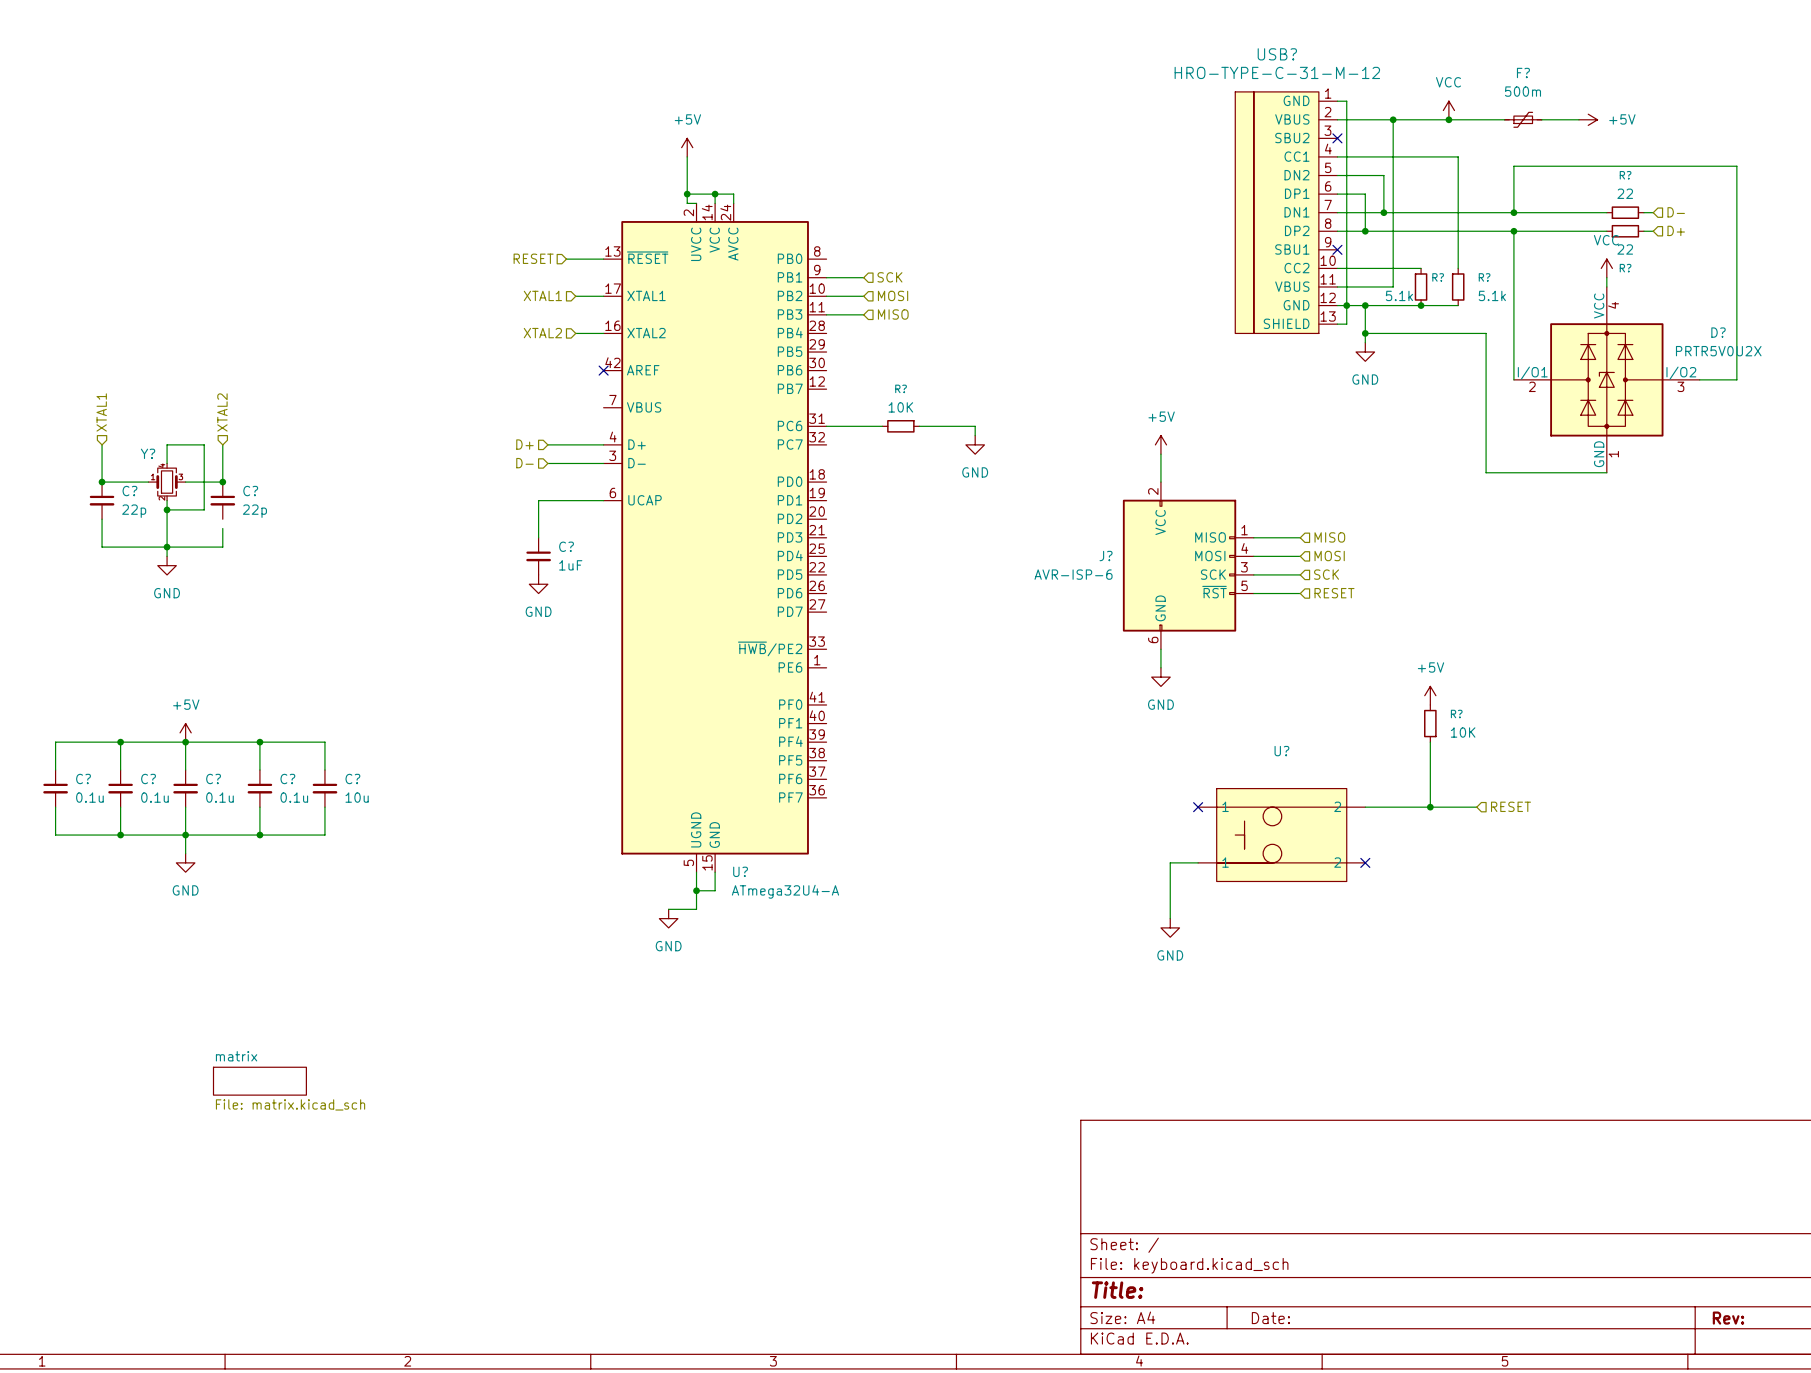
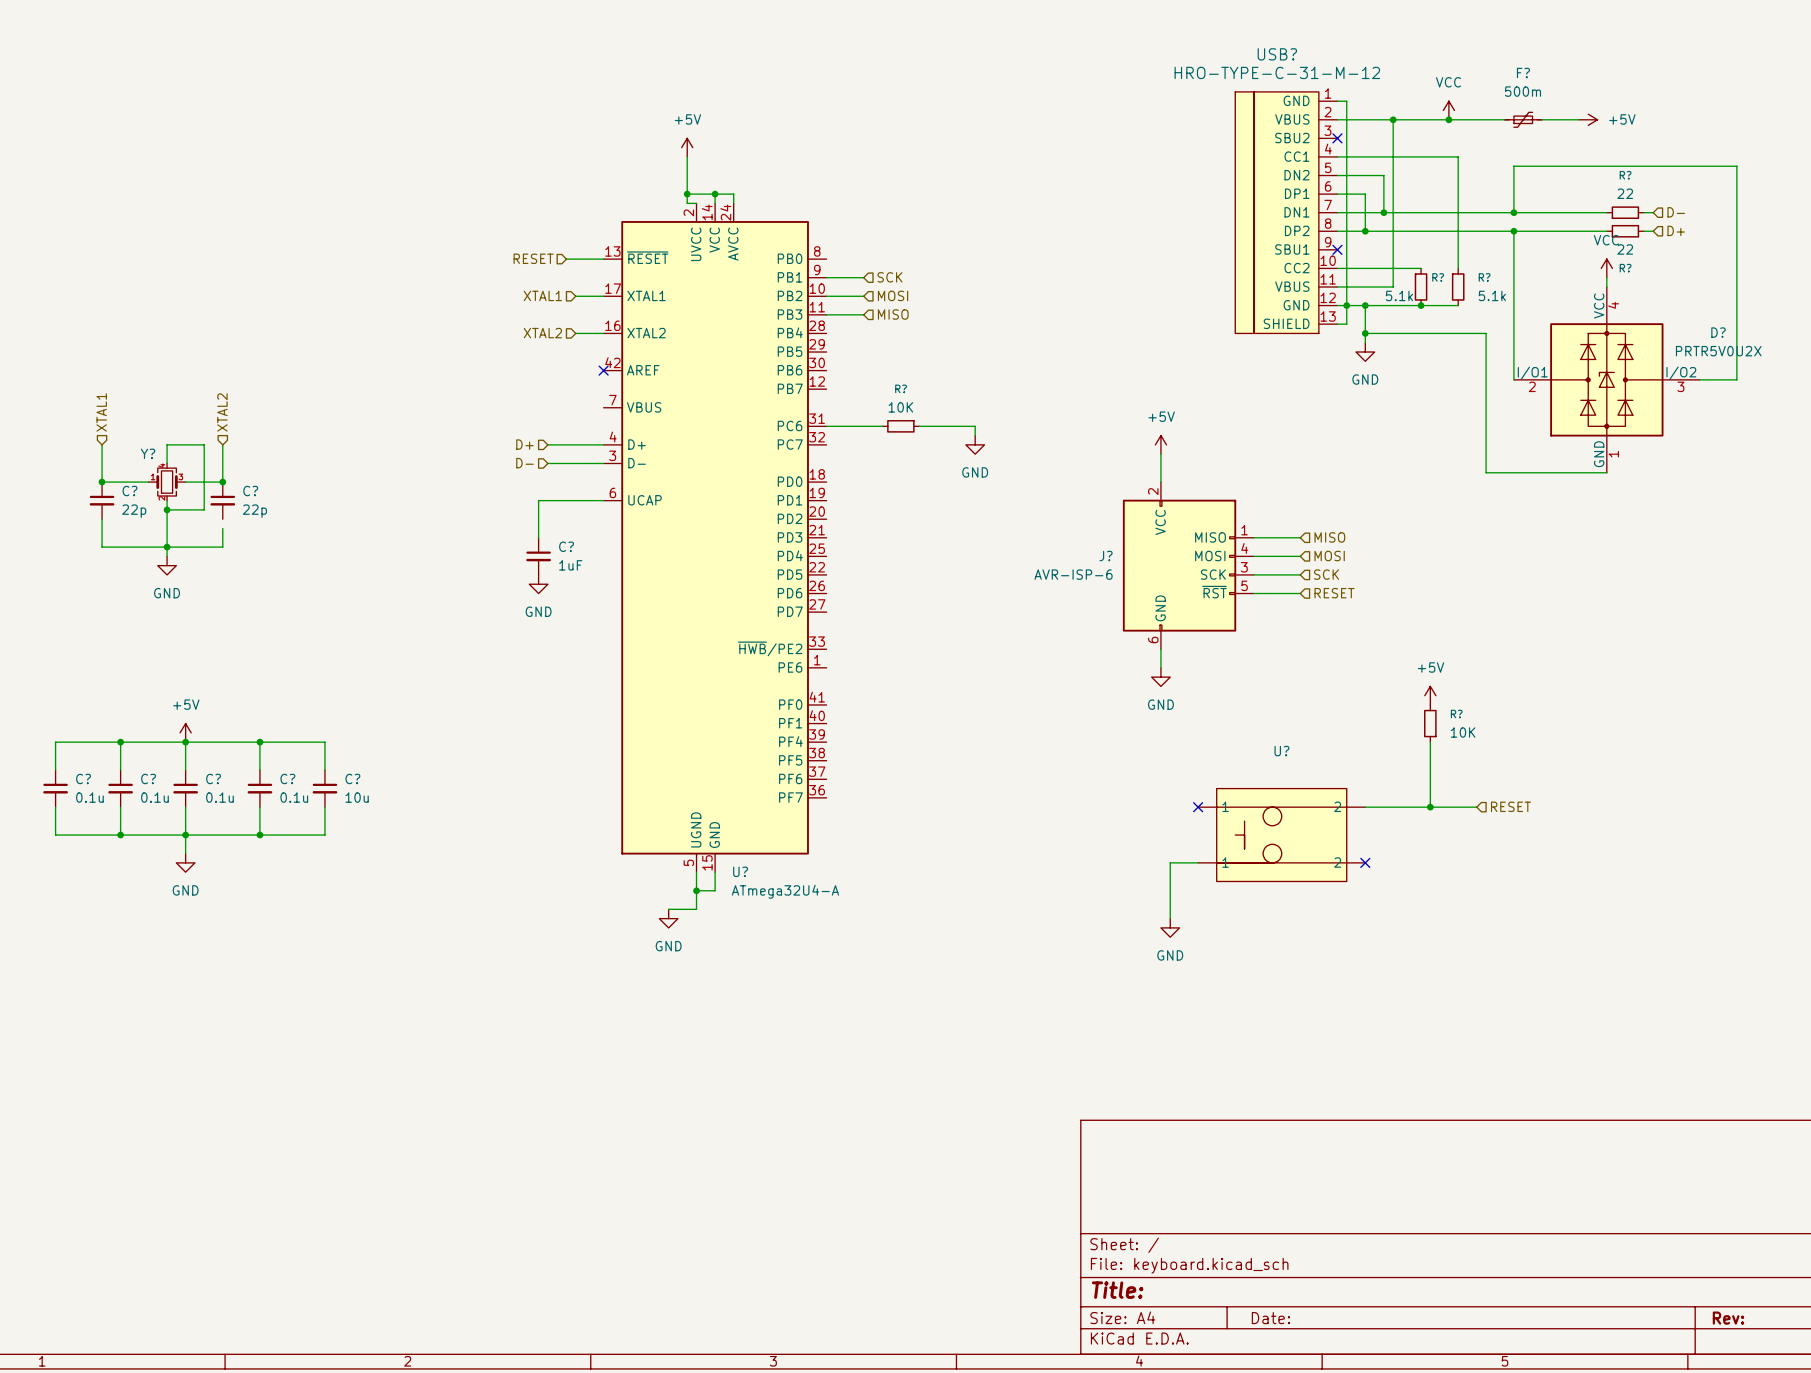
sheet matrix: File: matrix.kicad_sch (259, 1081) -> none

